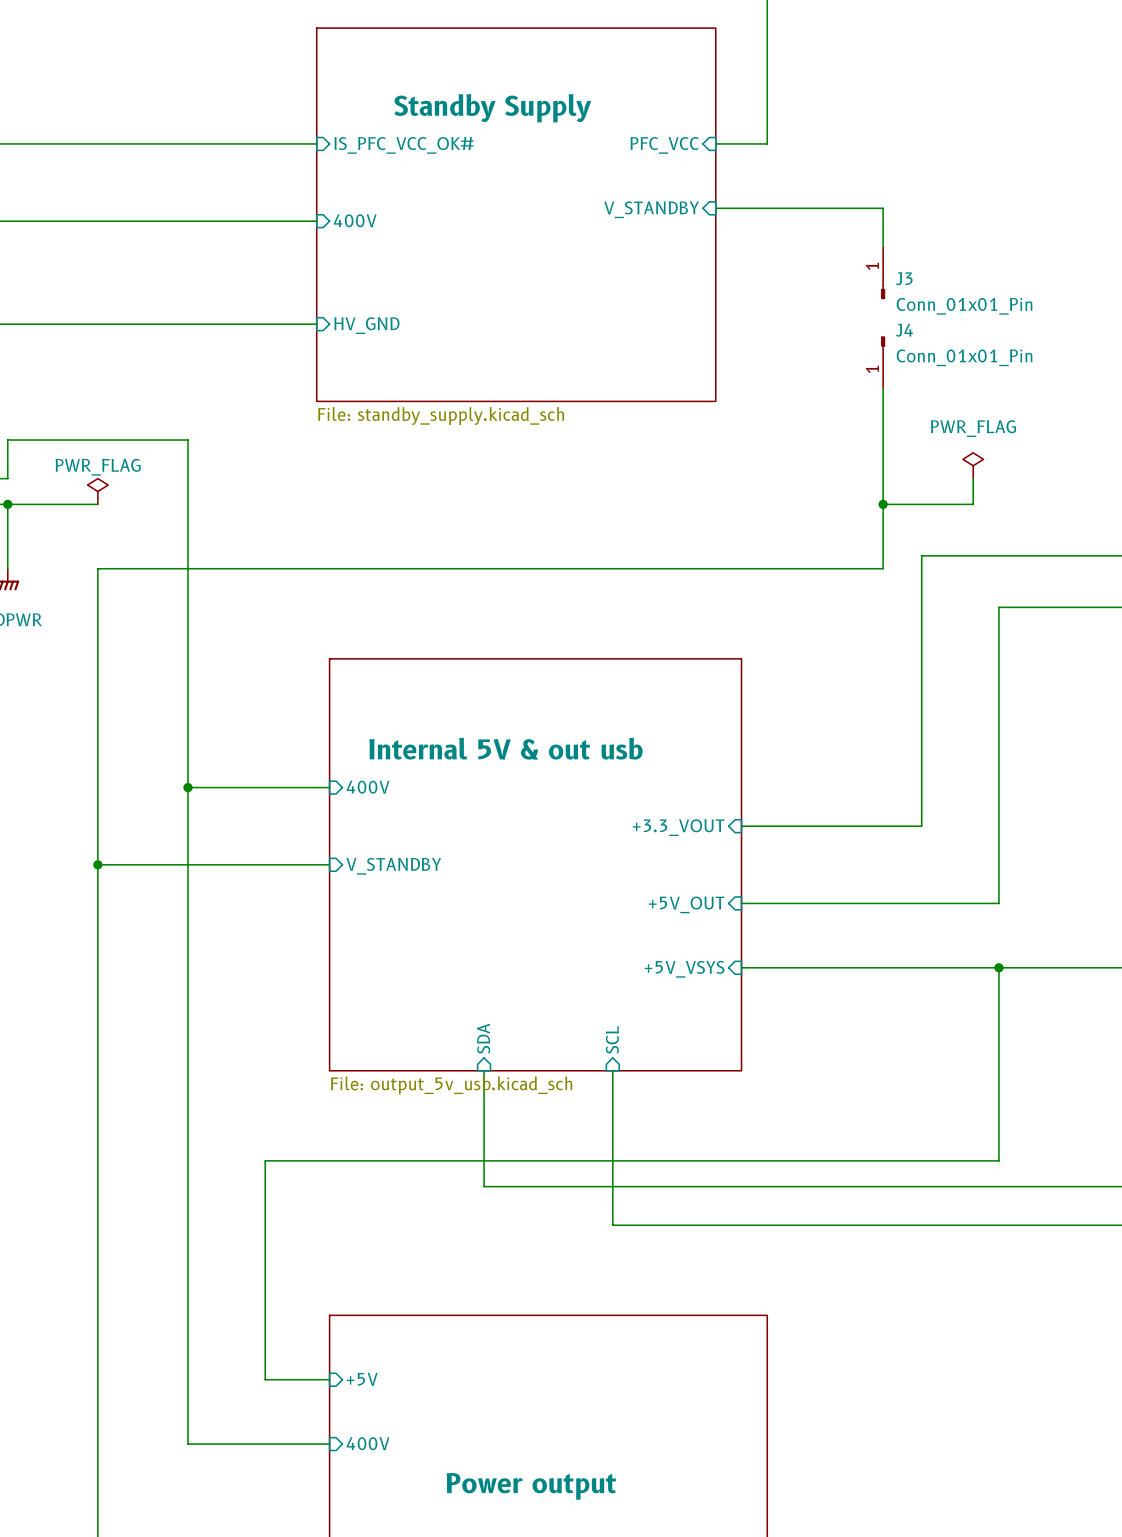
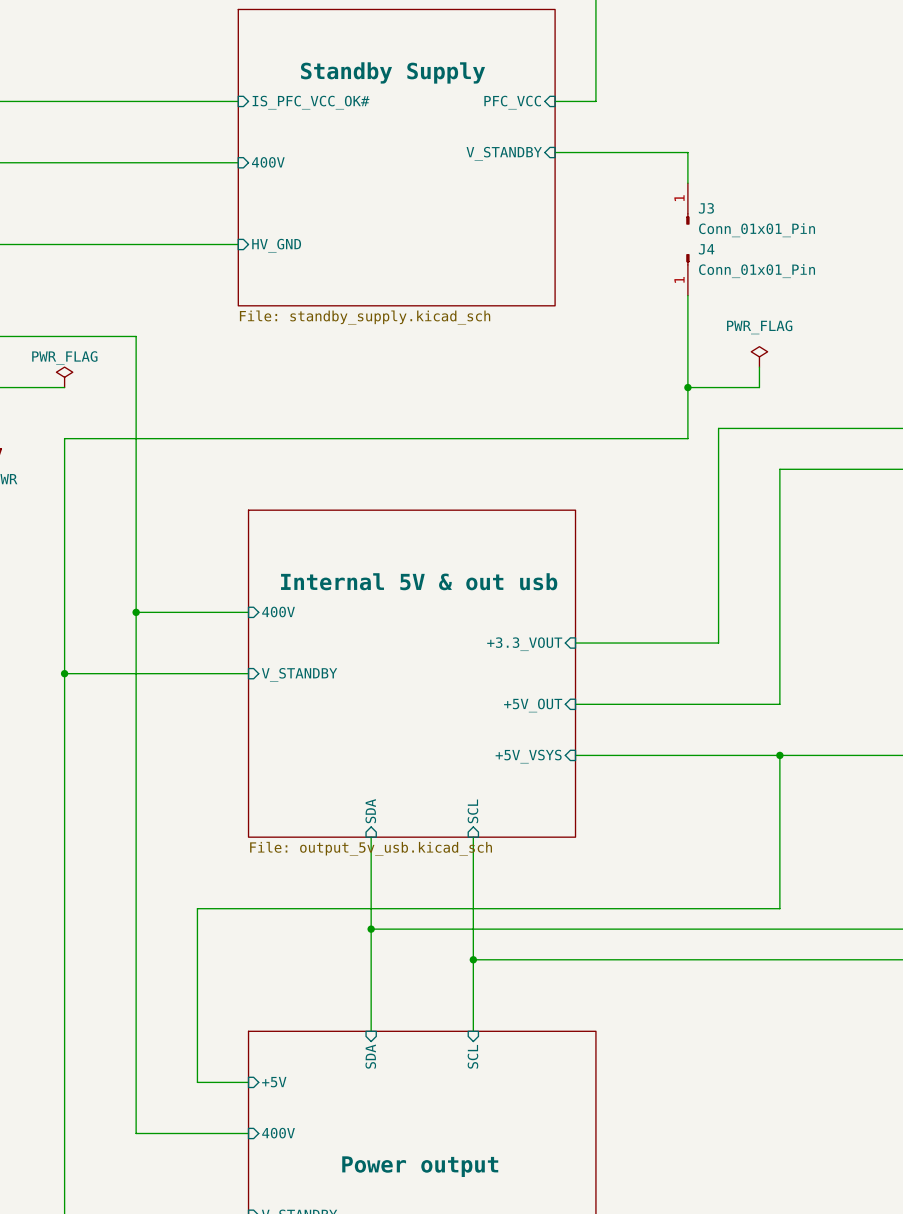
wire: none -> (371, 929) (371, 1031)
junction: none -> (371, 929)
wire: none -> (473, 959) (473, 1031)
junction: none -> (473, 959)
sheet pin: none -> SCL (472, 1056)
sheet pin: none -> SDA (370, 1056)

